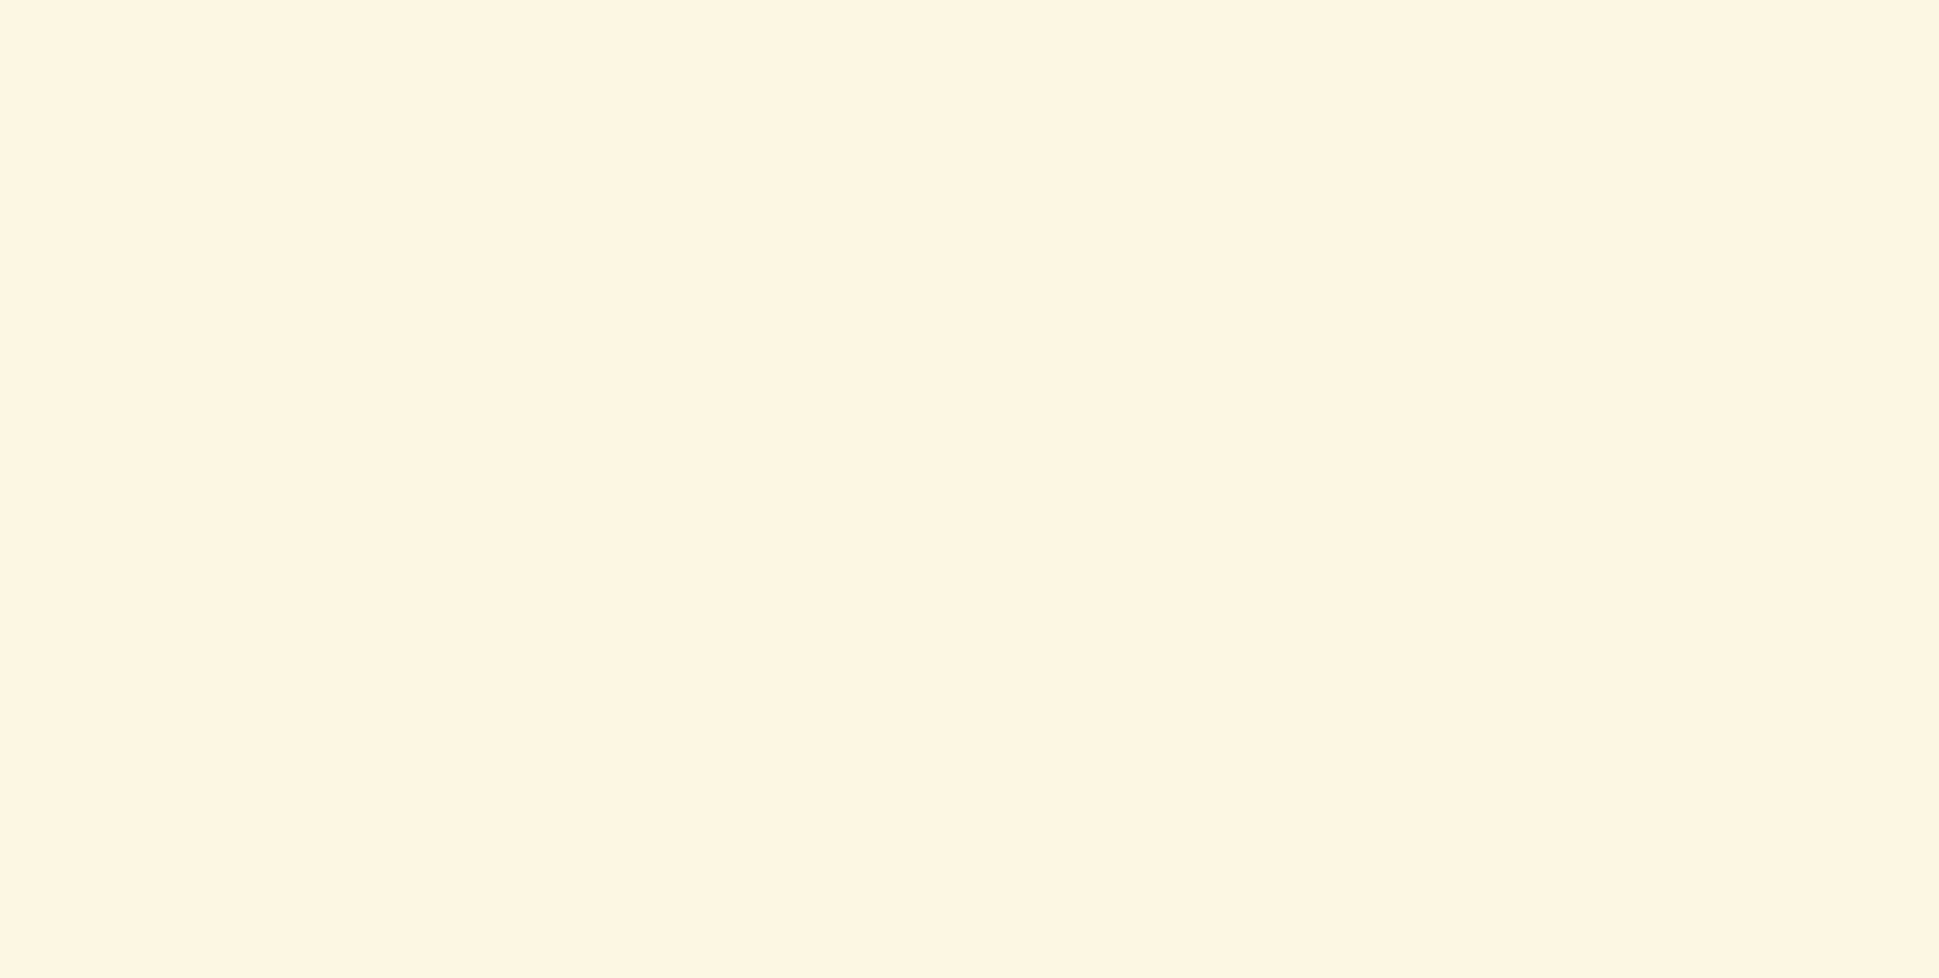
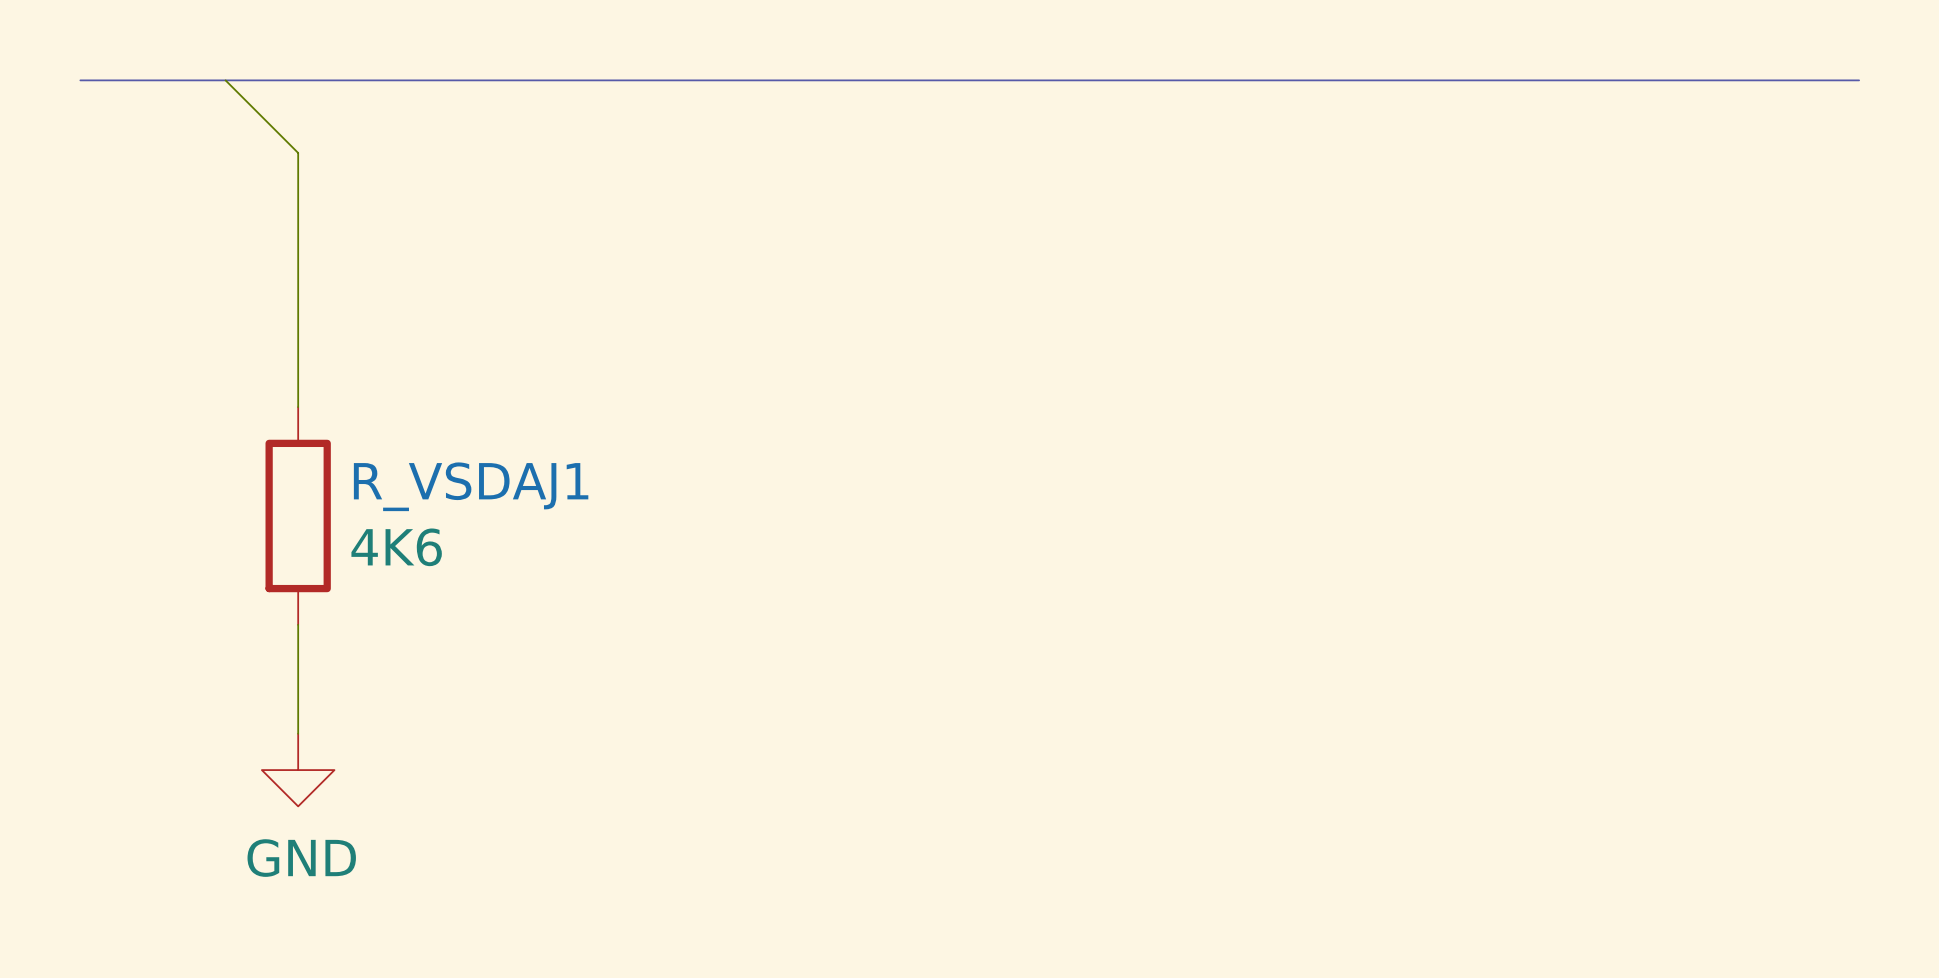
bus: none -> (80, 80) (1859, 80)
wire: none -> (225, 80) (298, 152) (298, 407)
R_VSDAJ1: none -> 4K6 (298, 515)
wire: none -> (298, 624) (298, 733)
power symbol: none -> GND (298, 770)

